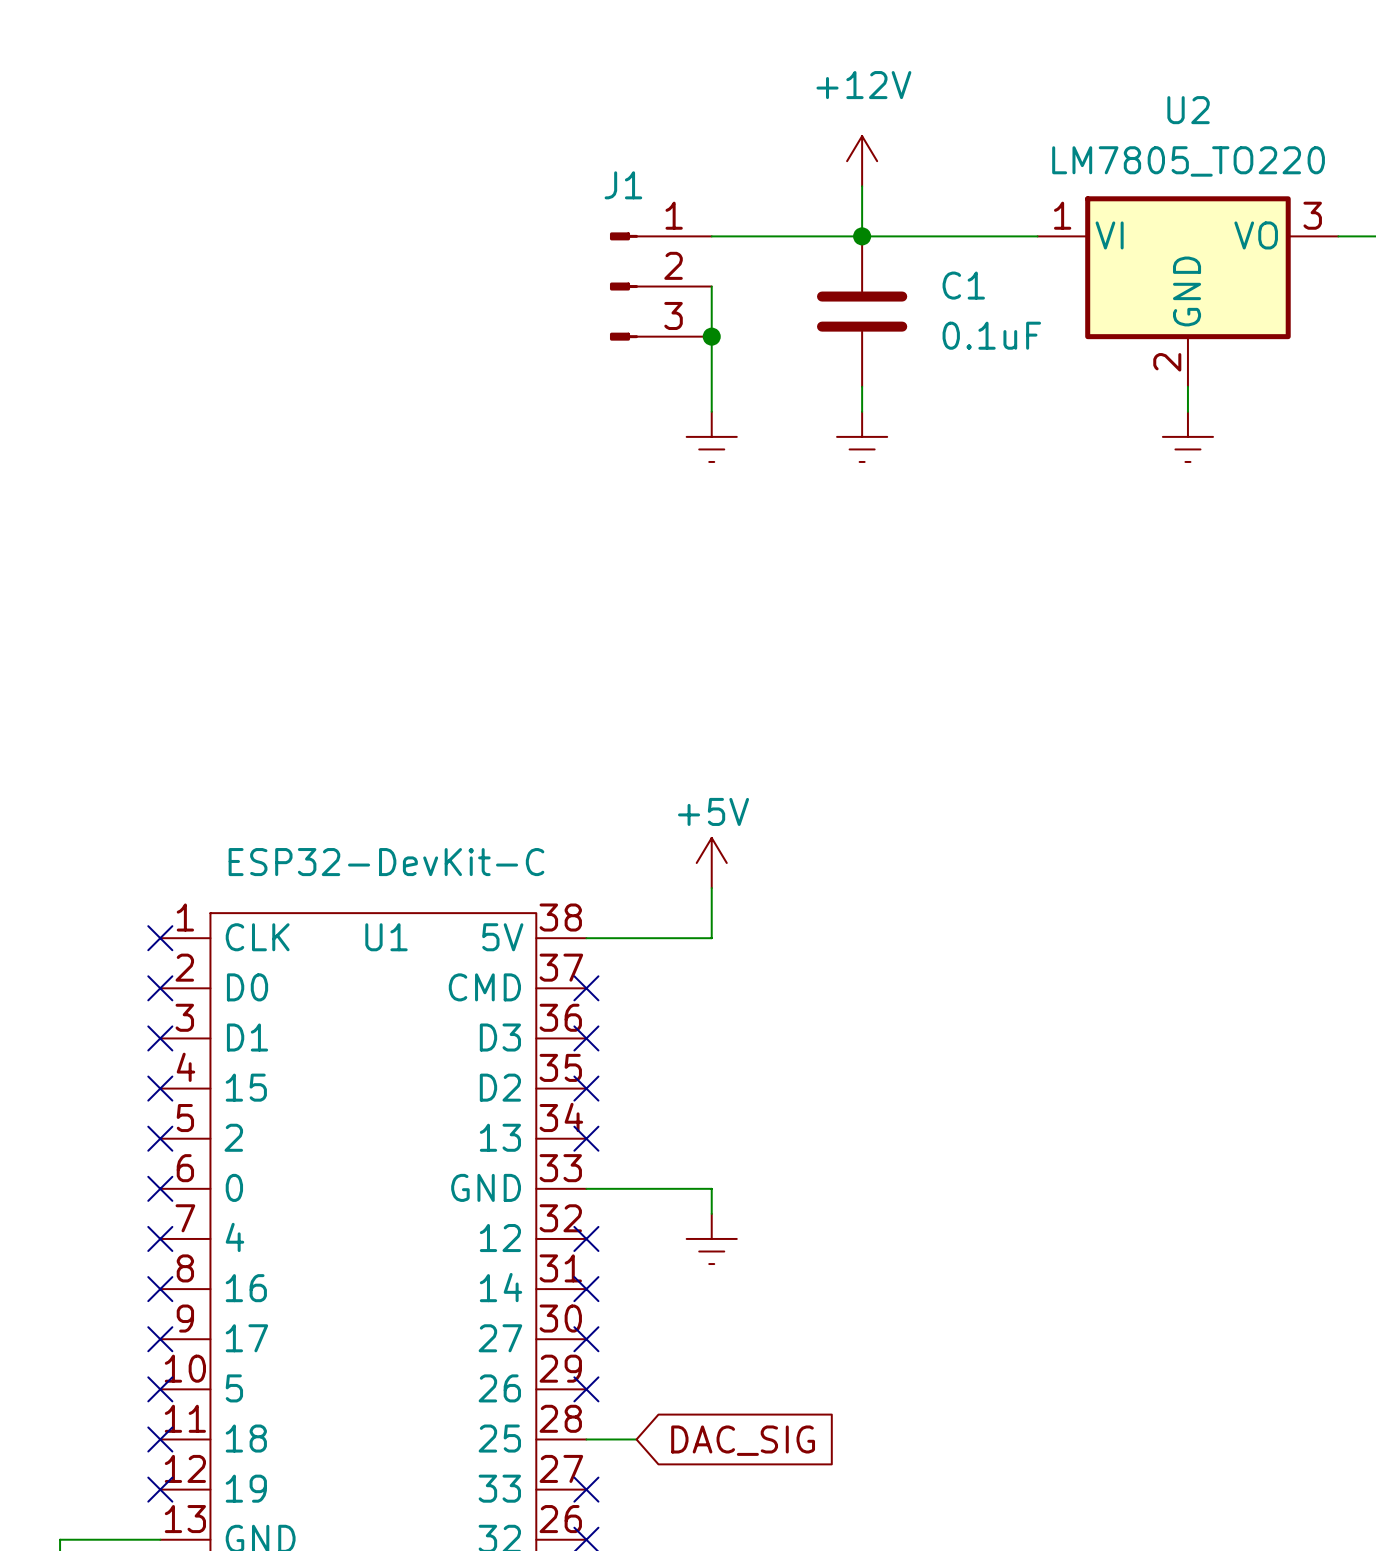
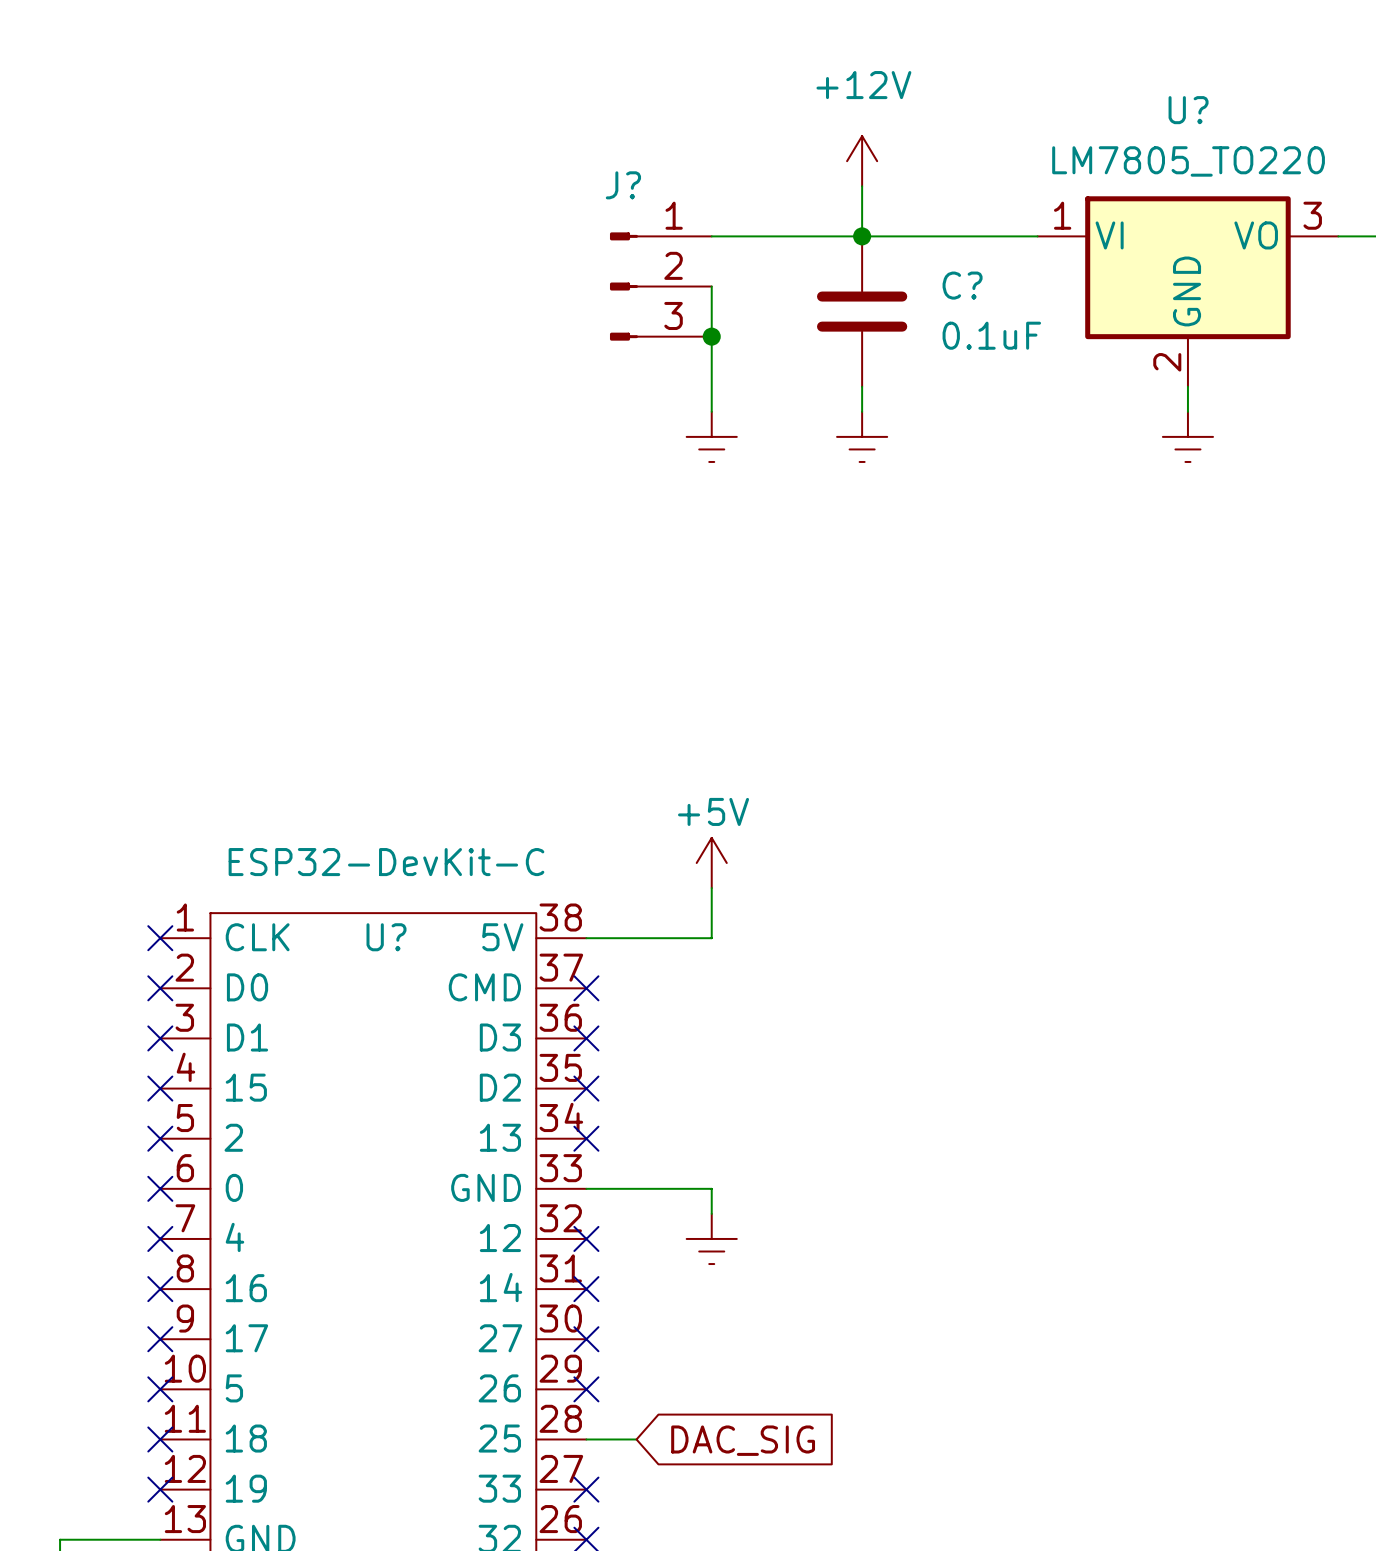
U2 name: U2 (1188, 110) -> U? (1188, 110)
J1 name: J1 (623, 185) -> J? (623, 185)
C1 name: C1 (963, 285) -> C? (962, 285)
U1 name: U1 (386, 937) -> U? (386, 937)

